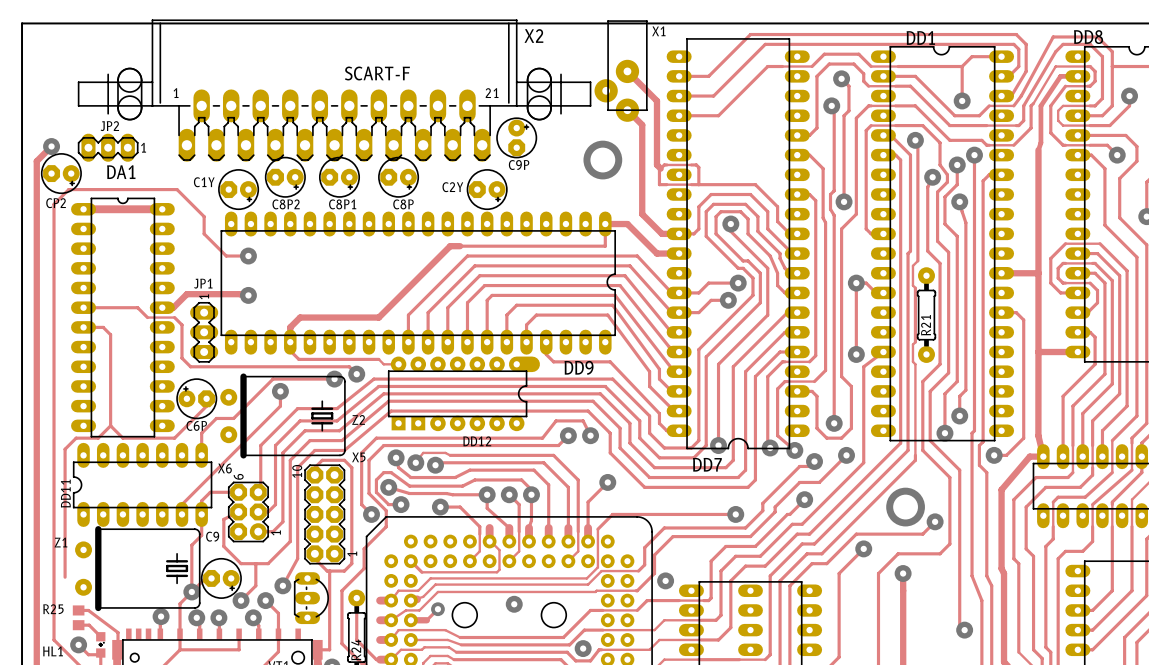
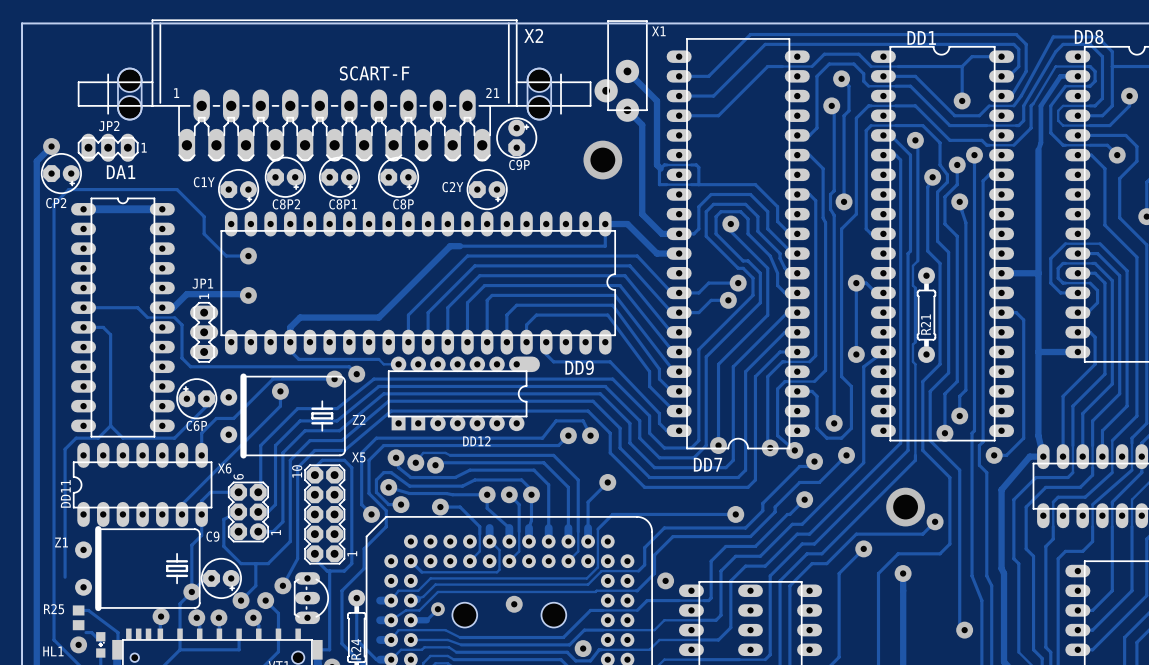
track: (78, 625) (89, 625) (100, 636) -> none
track: none -> (86, 632) (91, 632) (100, 641)
track: (78, 644) (88, 654) (100, 654) -> none

